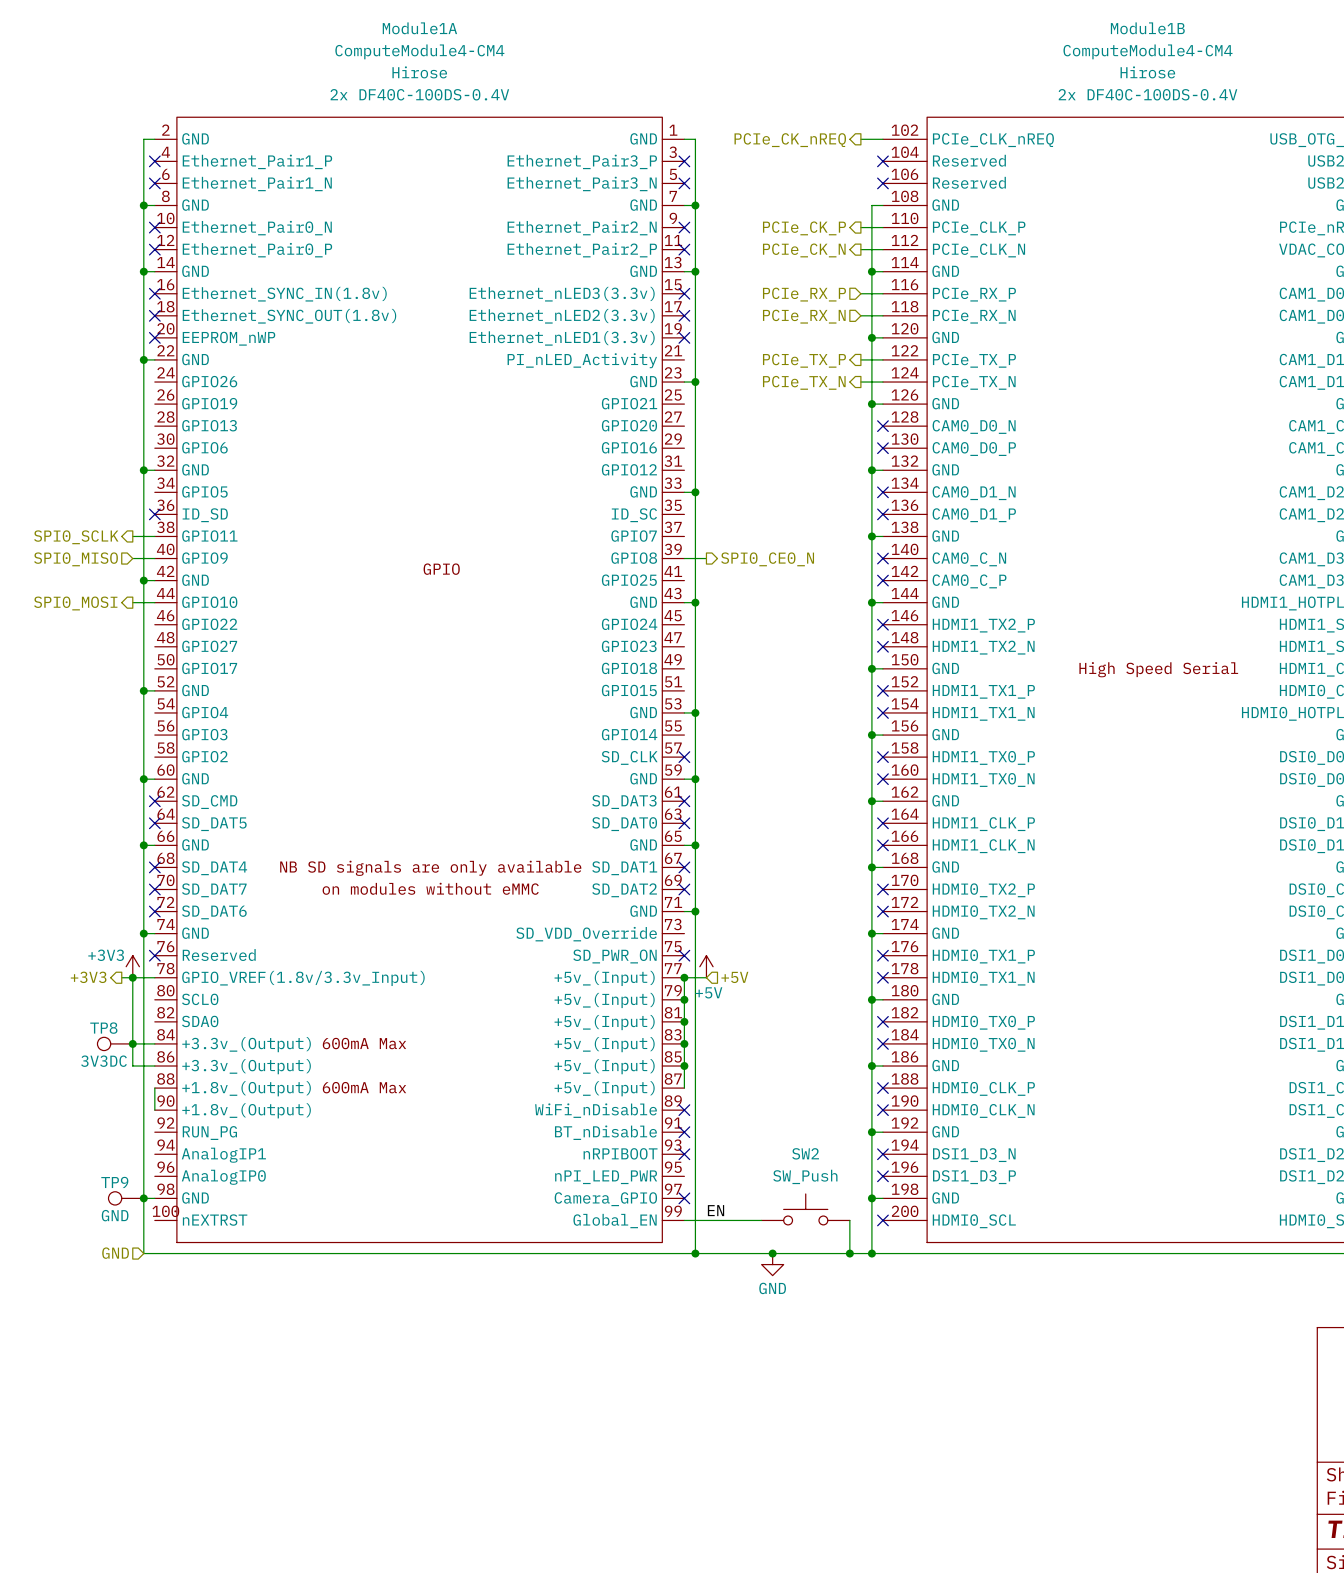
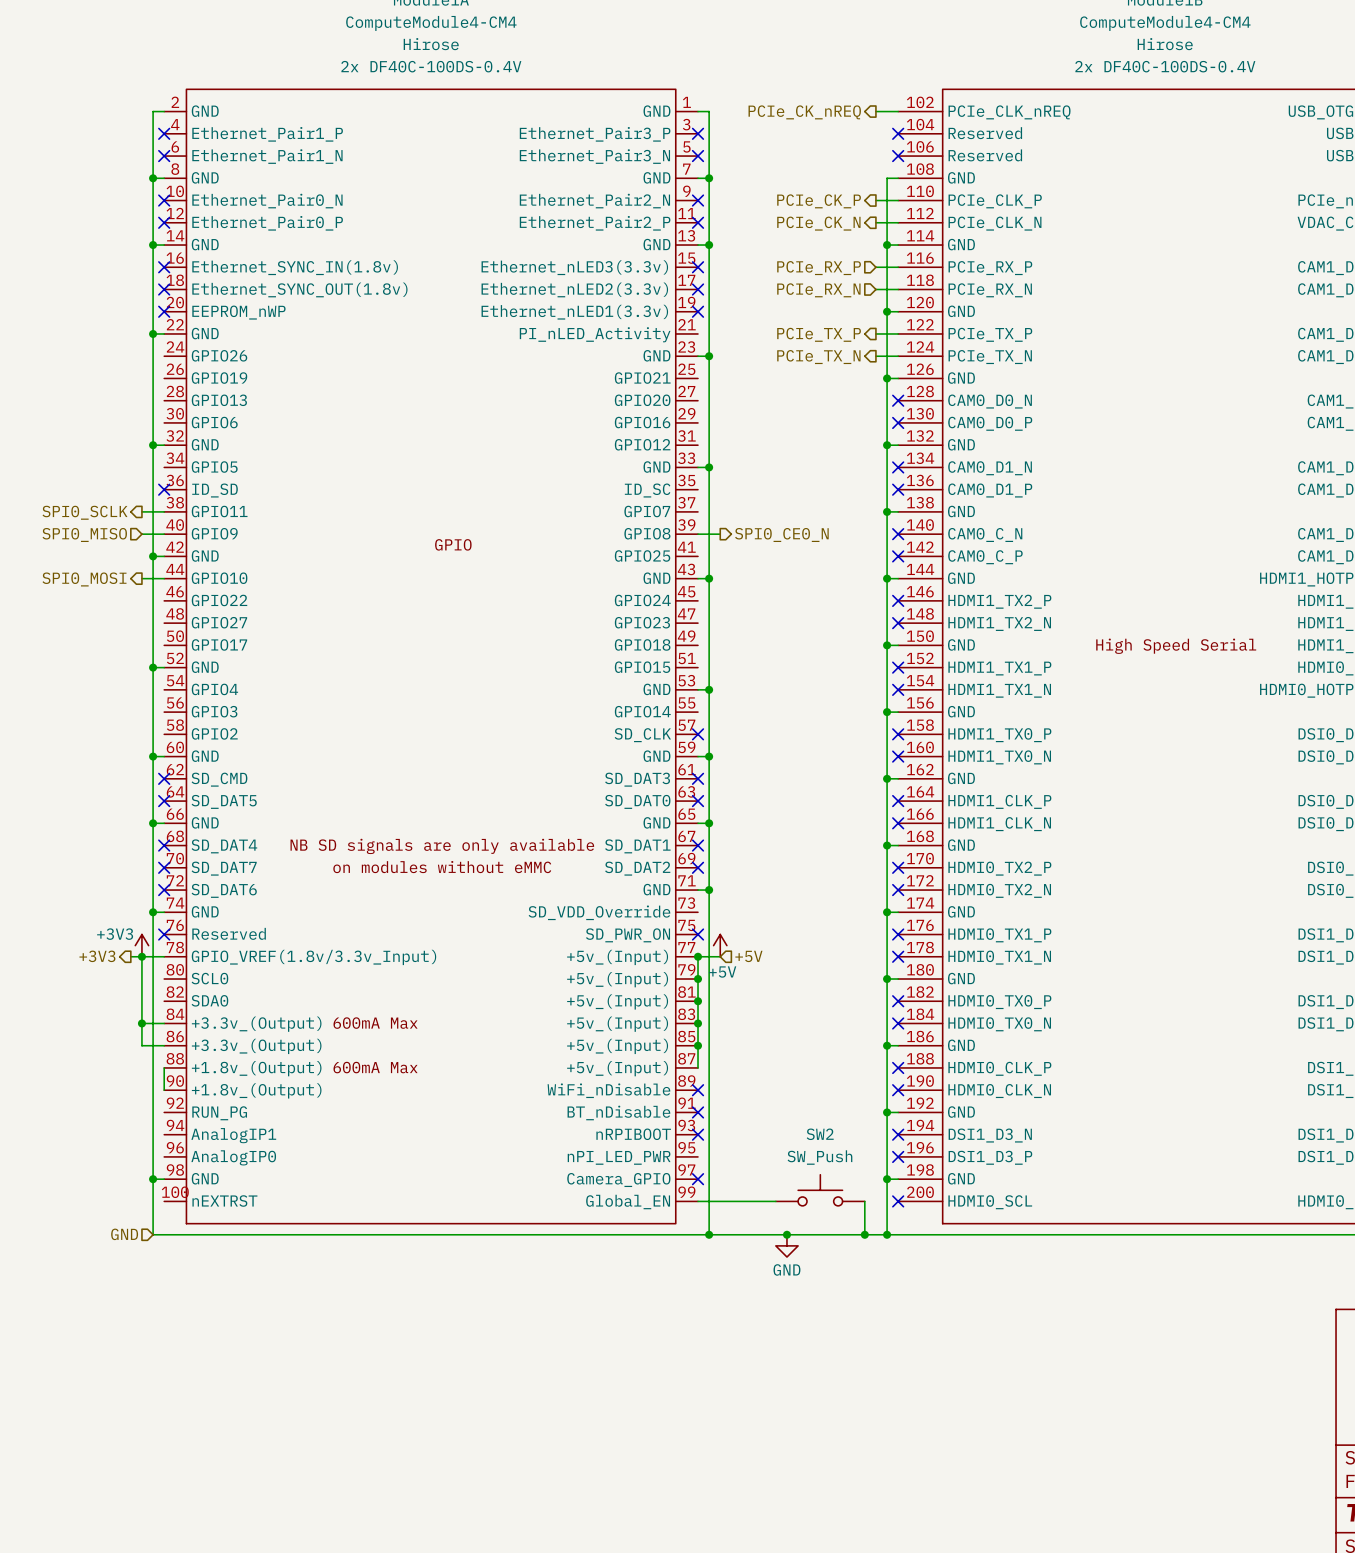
TP8: 3V3DC (115, 1043) -> none
TP9: GND (126, 1198) -> none
label: EN (716, 1210) -> none

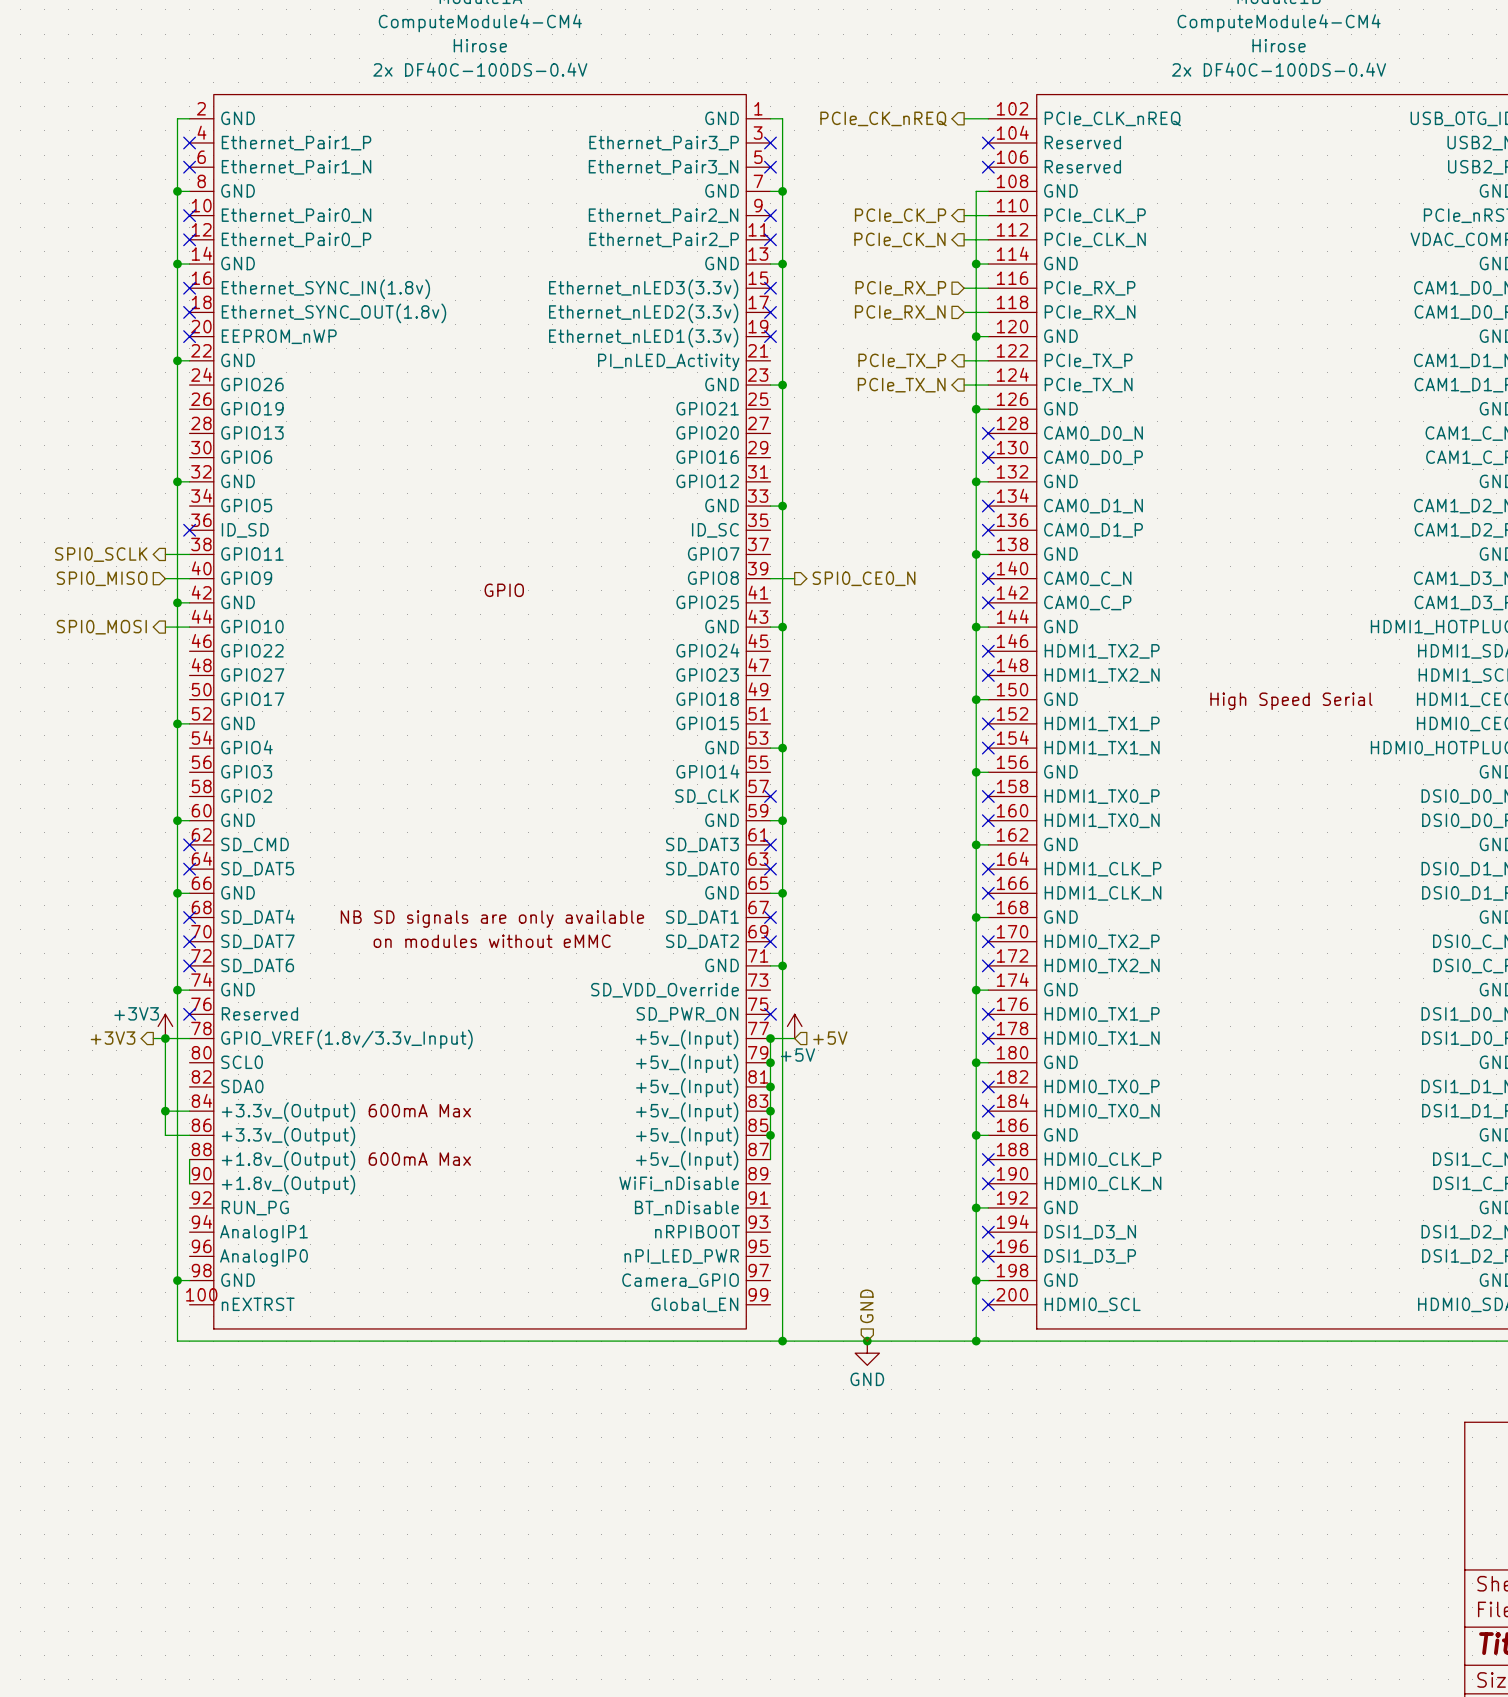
no-connect mark: (698, 1090) -> none
no-connect mark: (698, 1112) -> none
no-connect mark: (698, 1134) -> none
no-connect mark: (698, 1179) -> none
SW2: SW_Push (820, 1190) -> none
wire: (698, 1201) (775, 1201) -> none
wire: (864, 1201) (864, 1234) -> none
hierarchical label: none -> GND (866, 1306)
hierarchical label: GND (124, 1234) -> none
junction: (864, 1234) -> none

